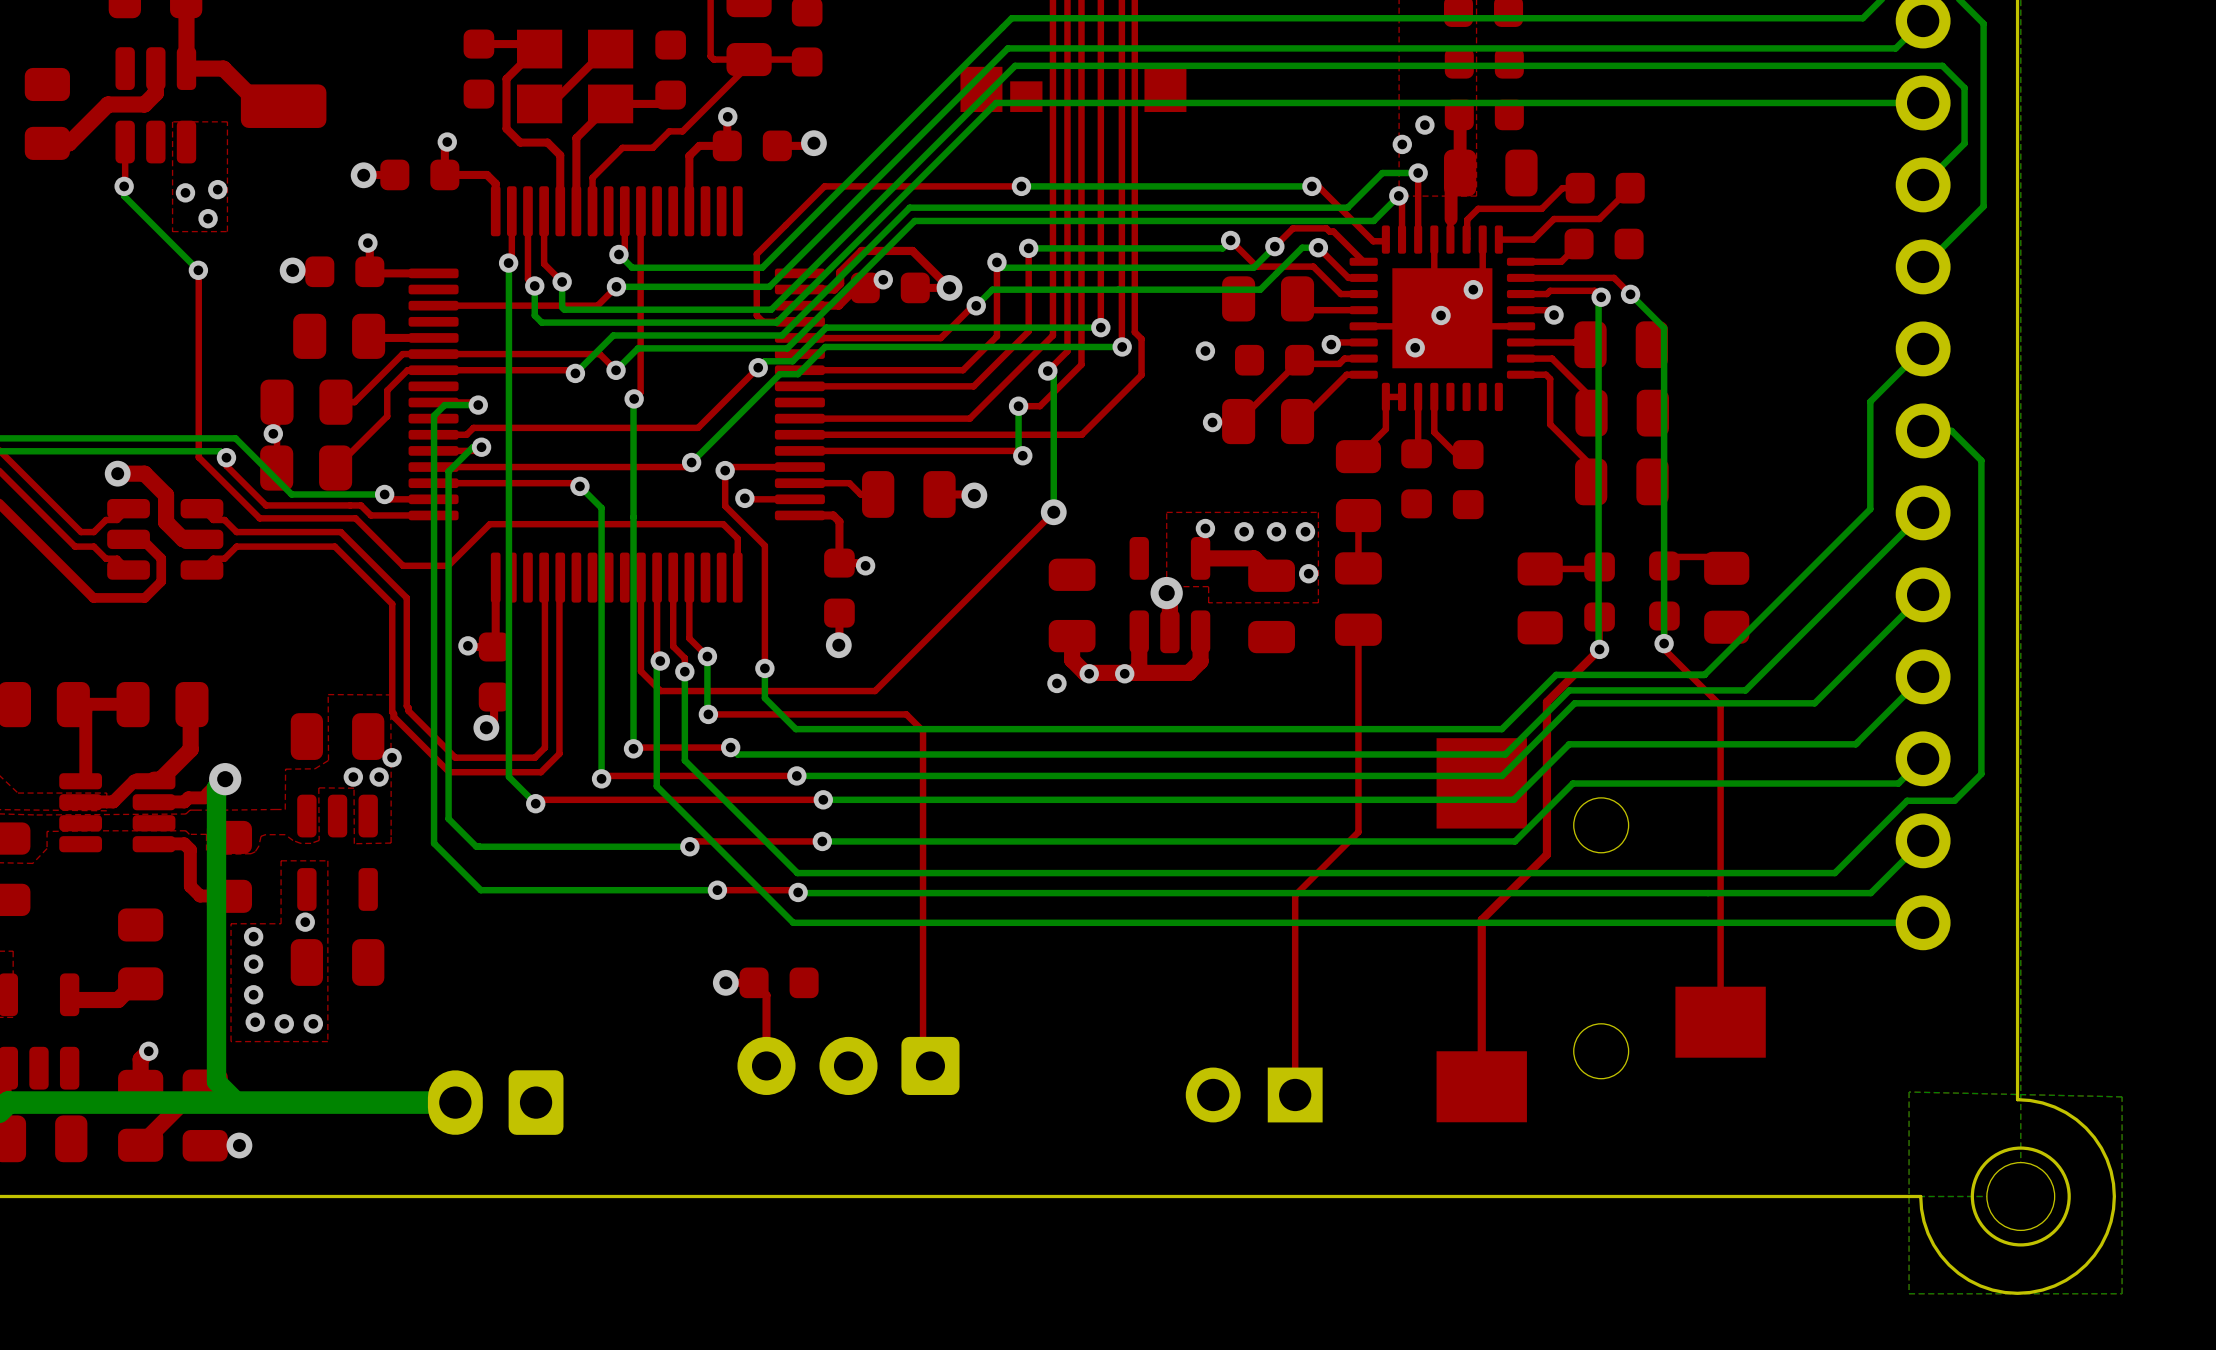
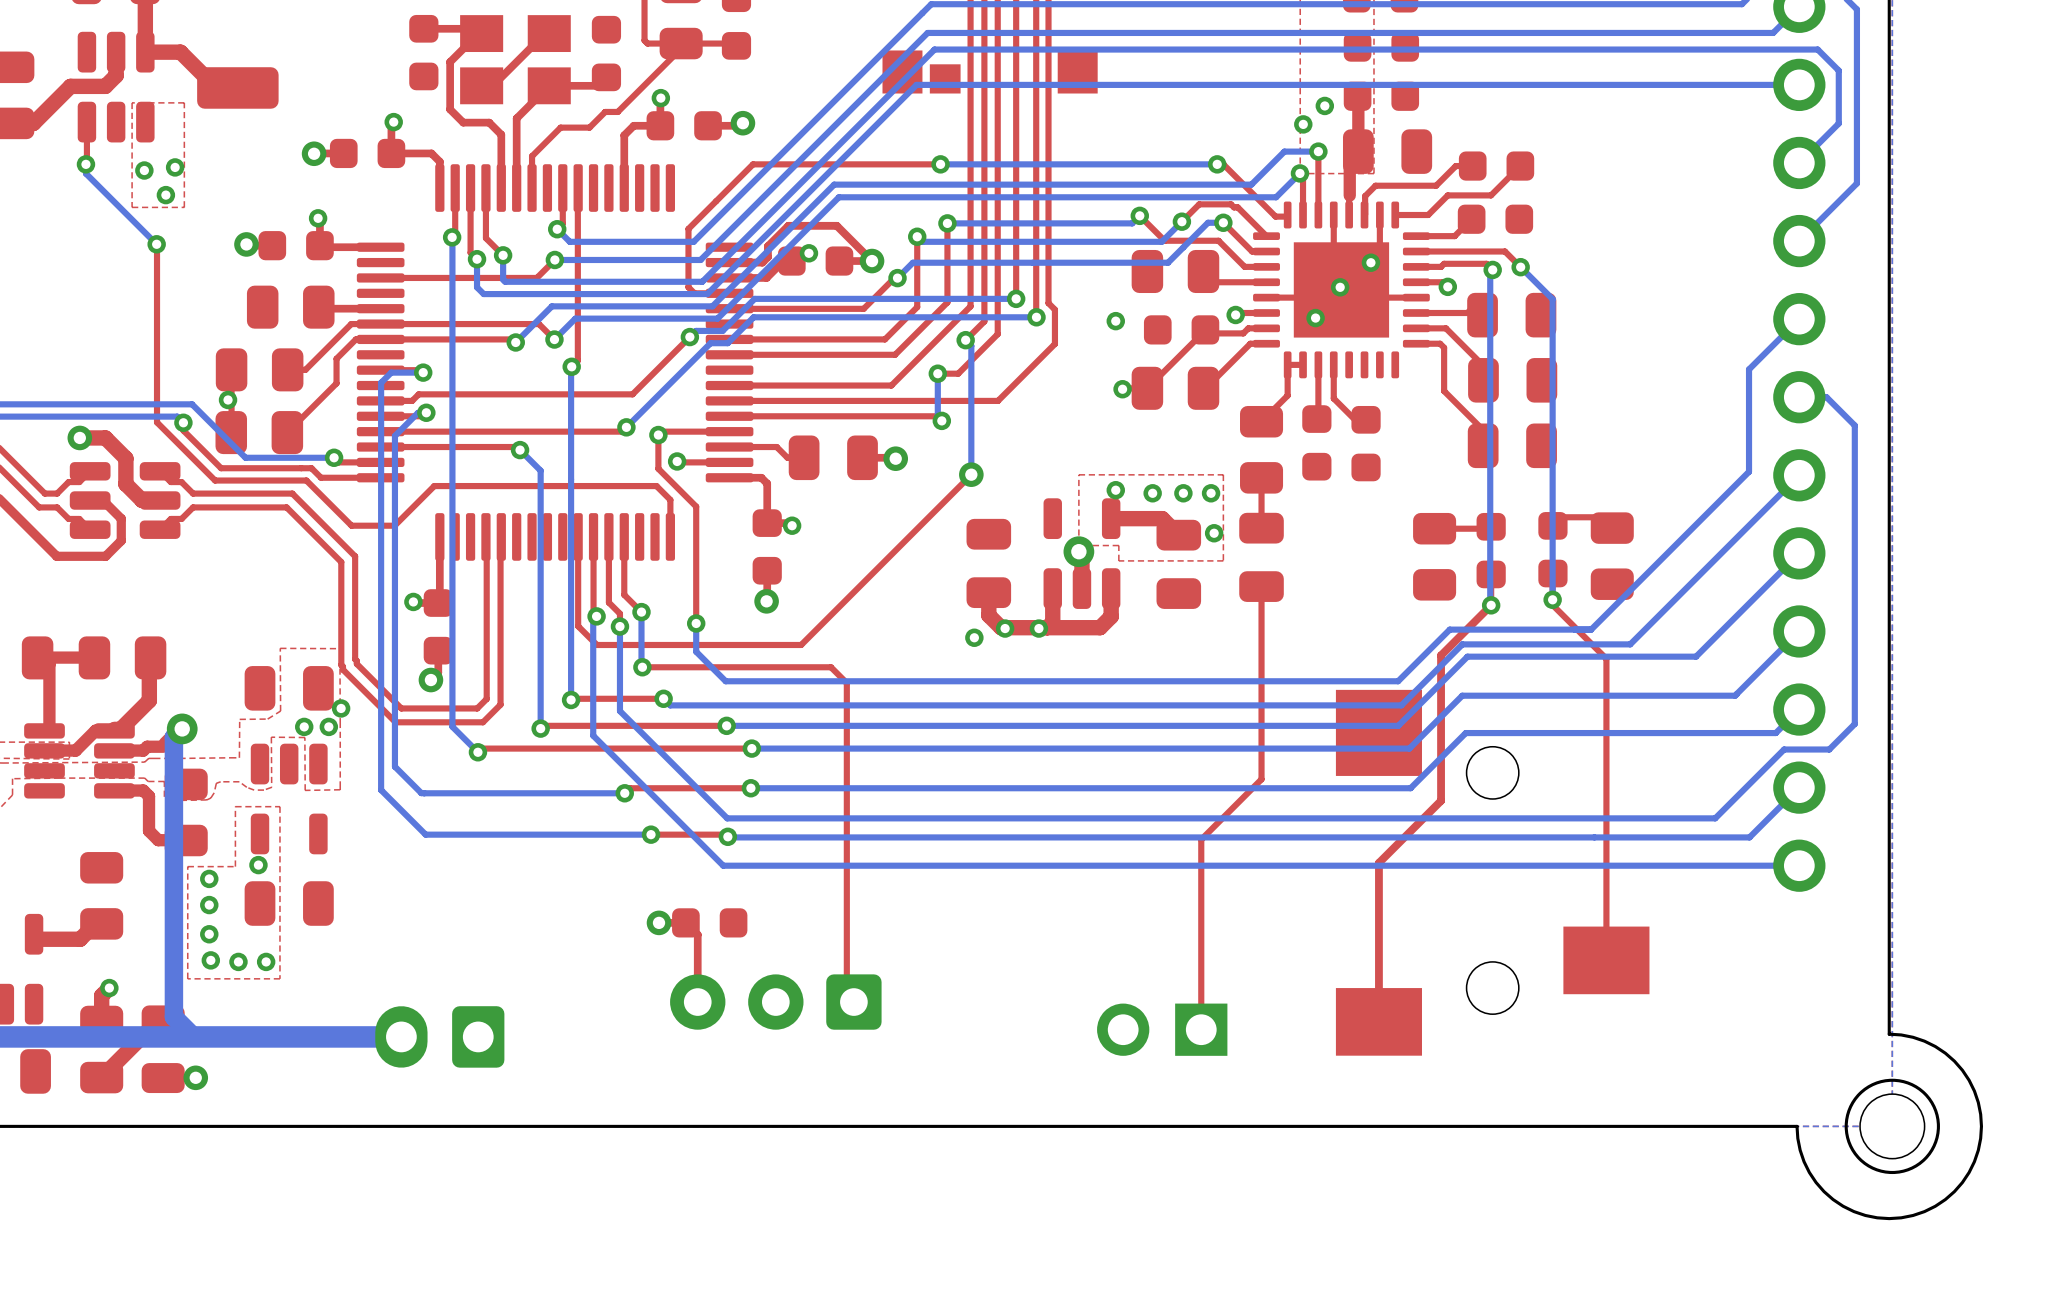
bottom zone outline: (1909, 1092) (2122, 1096) (2122, 1293) (1909, 1293) (1909, 1092) -> none

